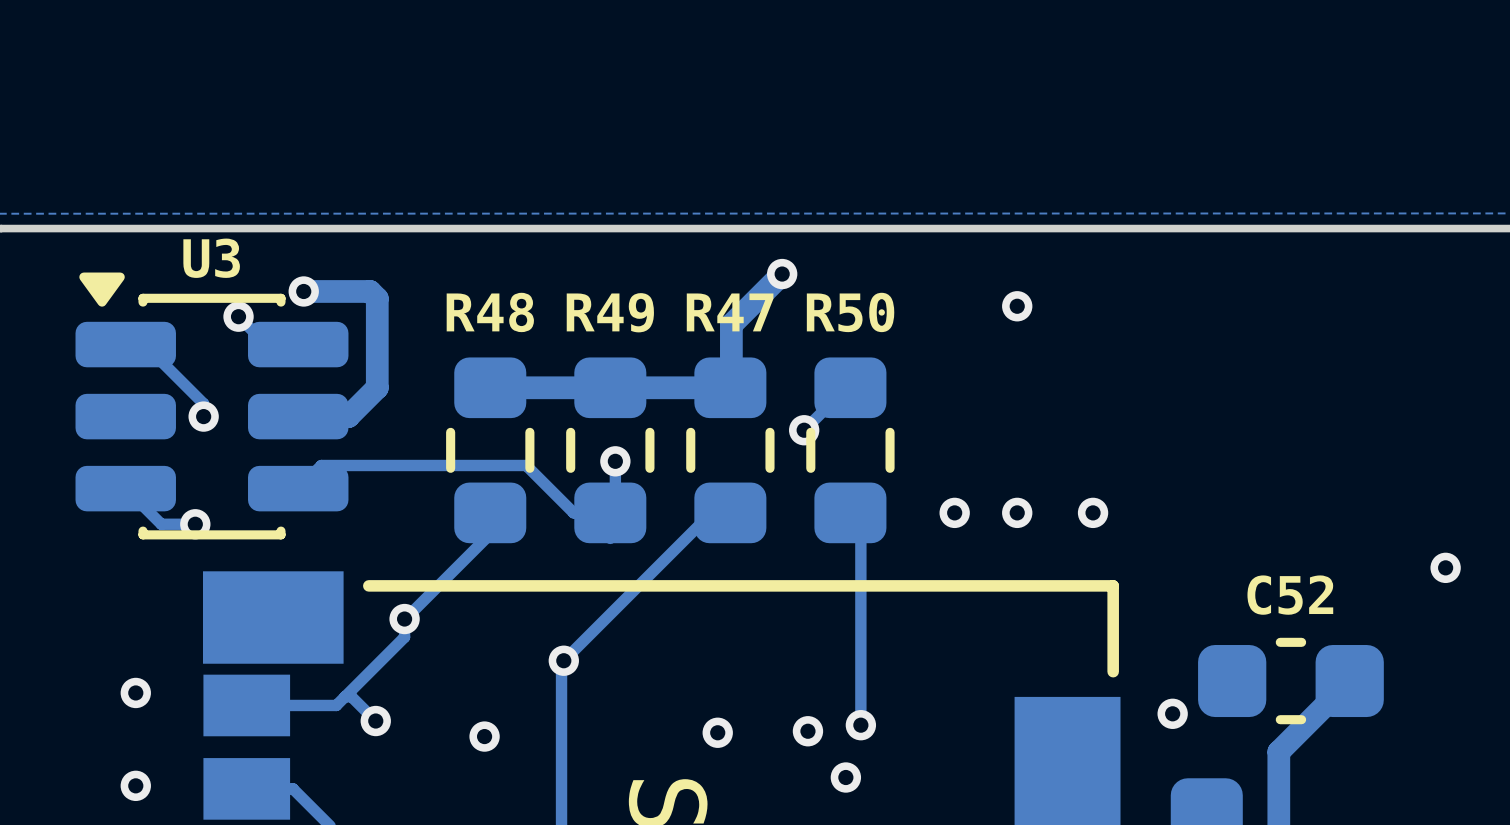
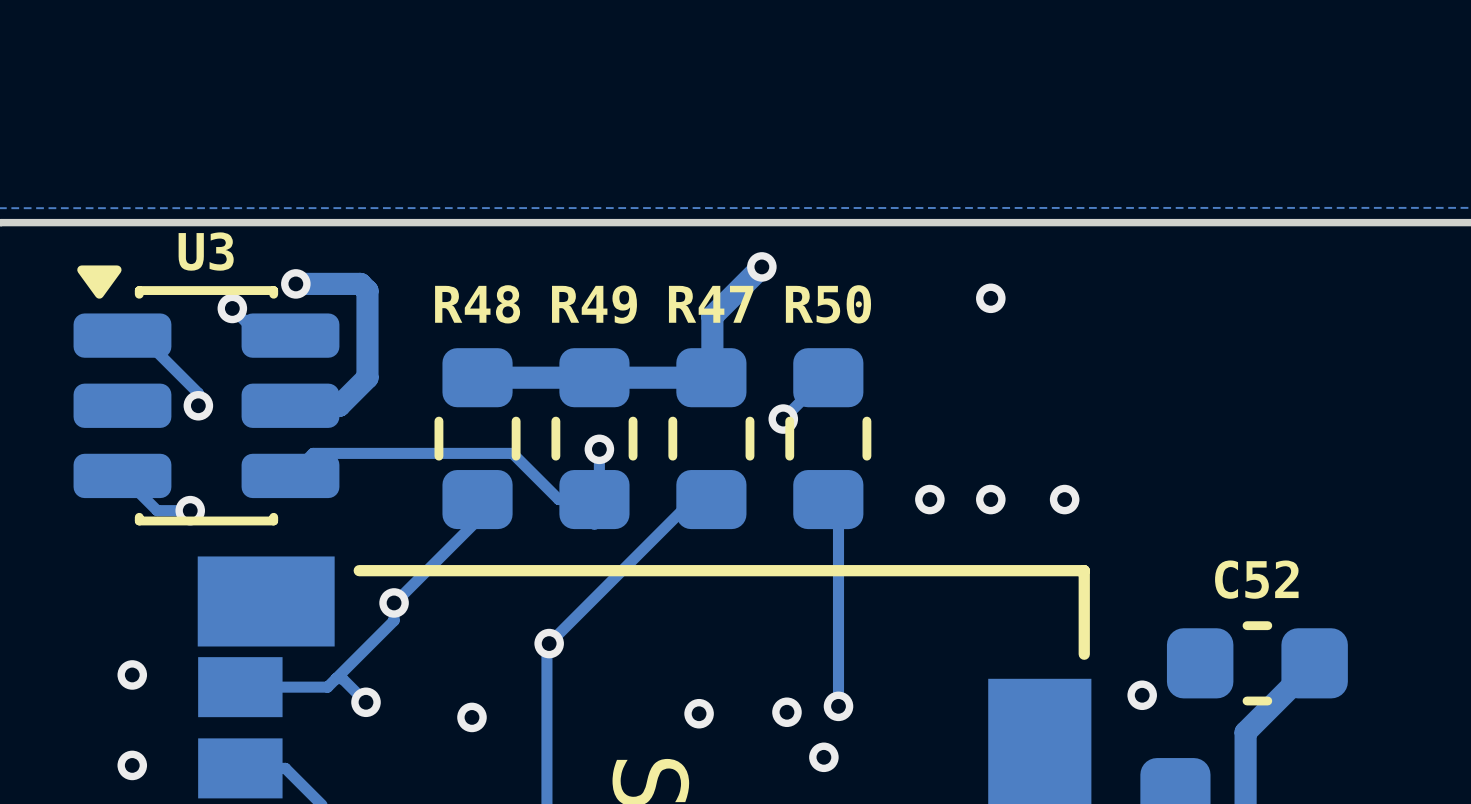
via: (1445, 567) -> none

